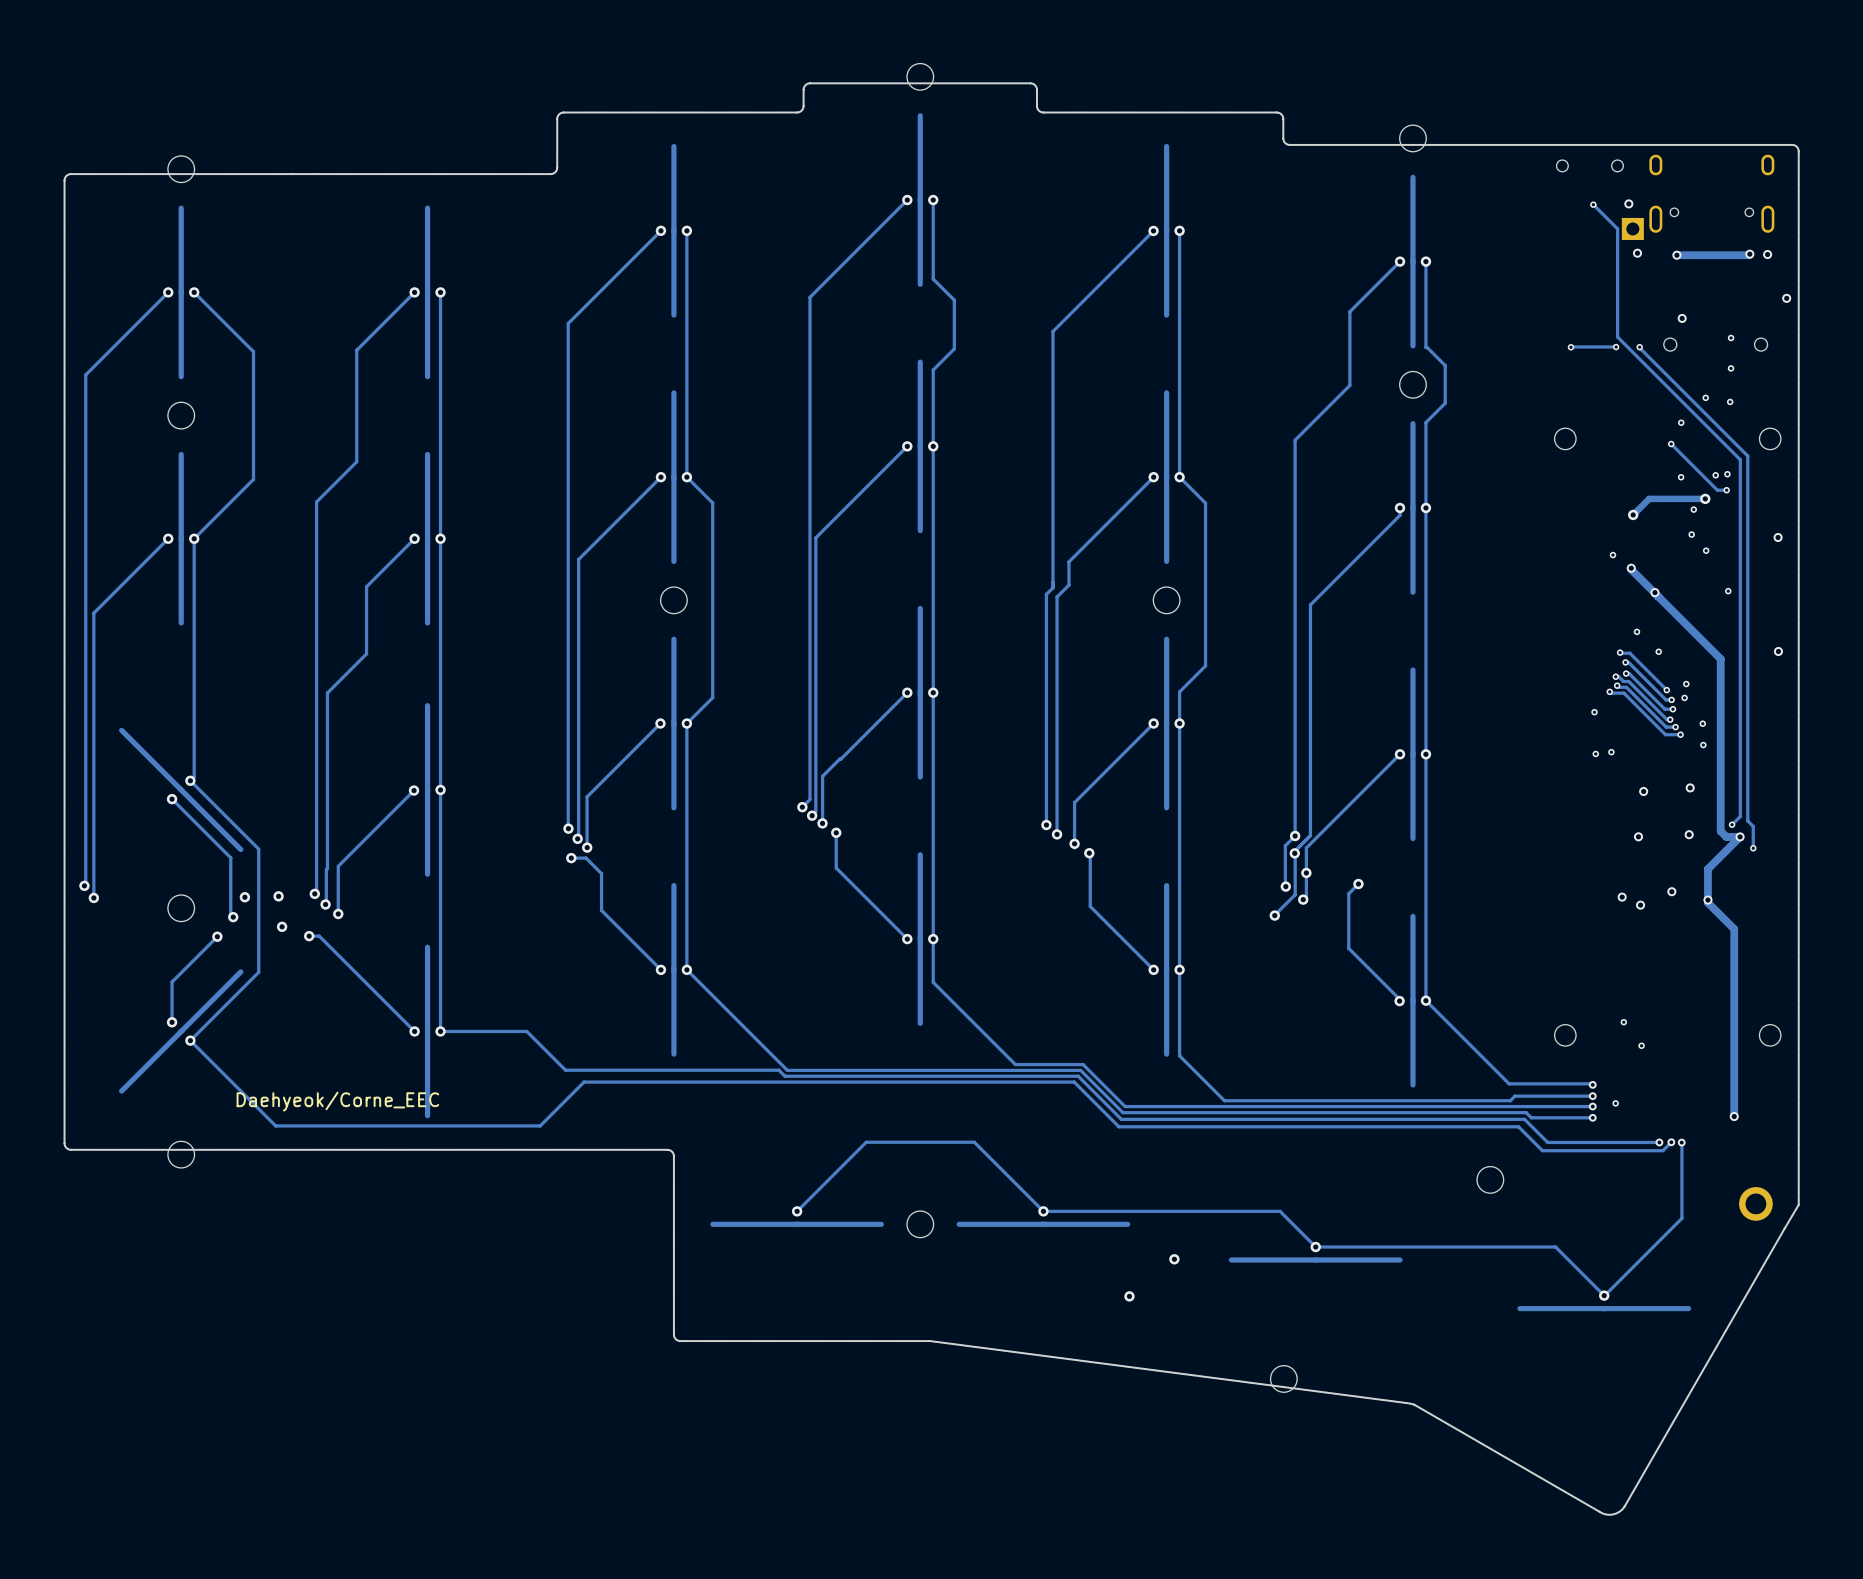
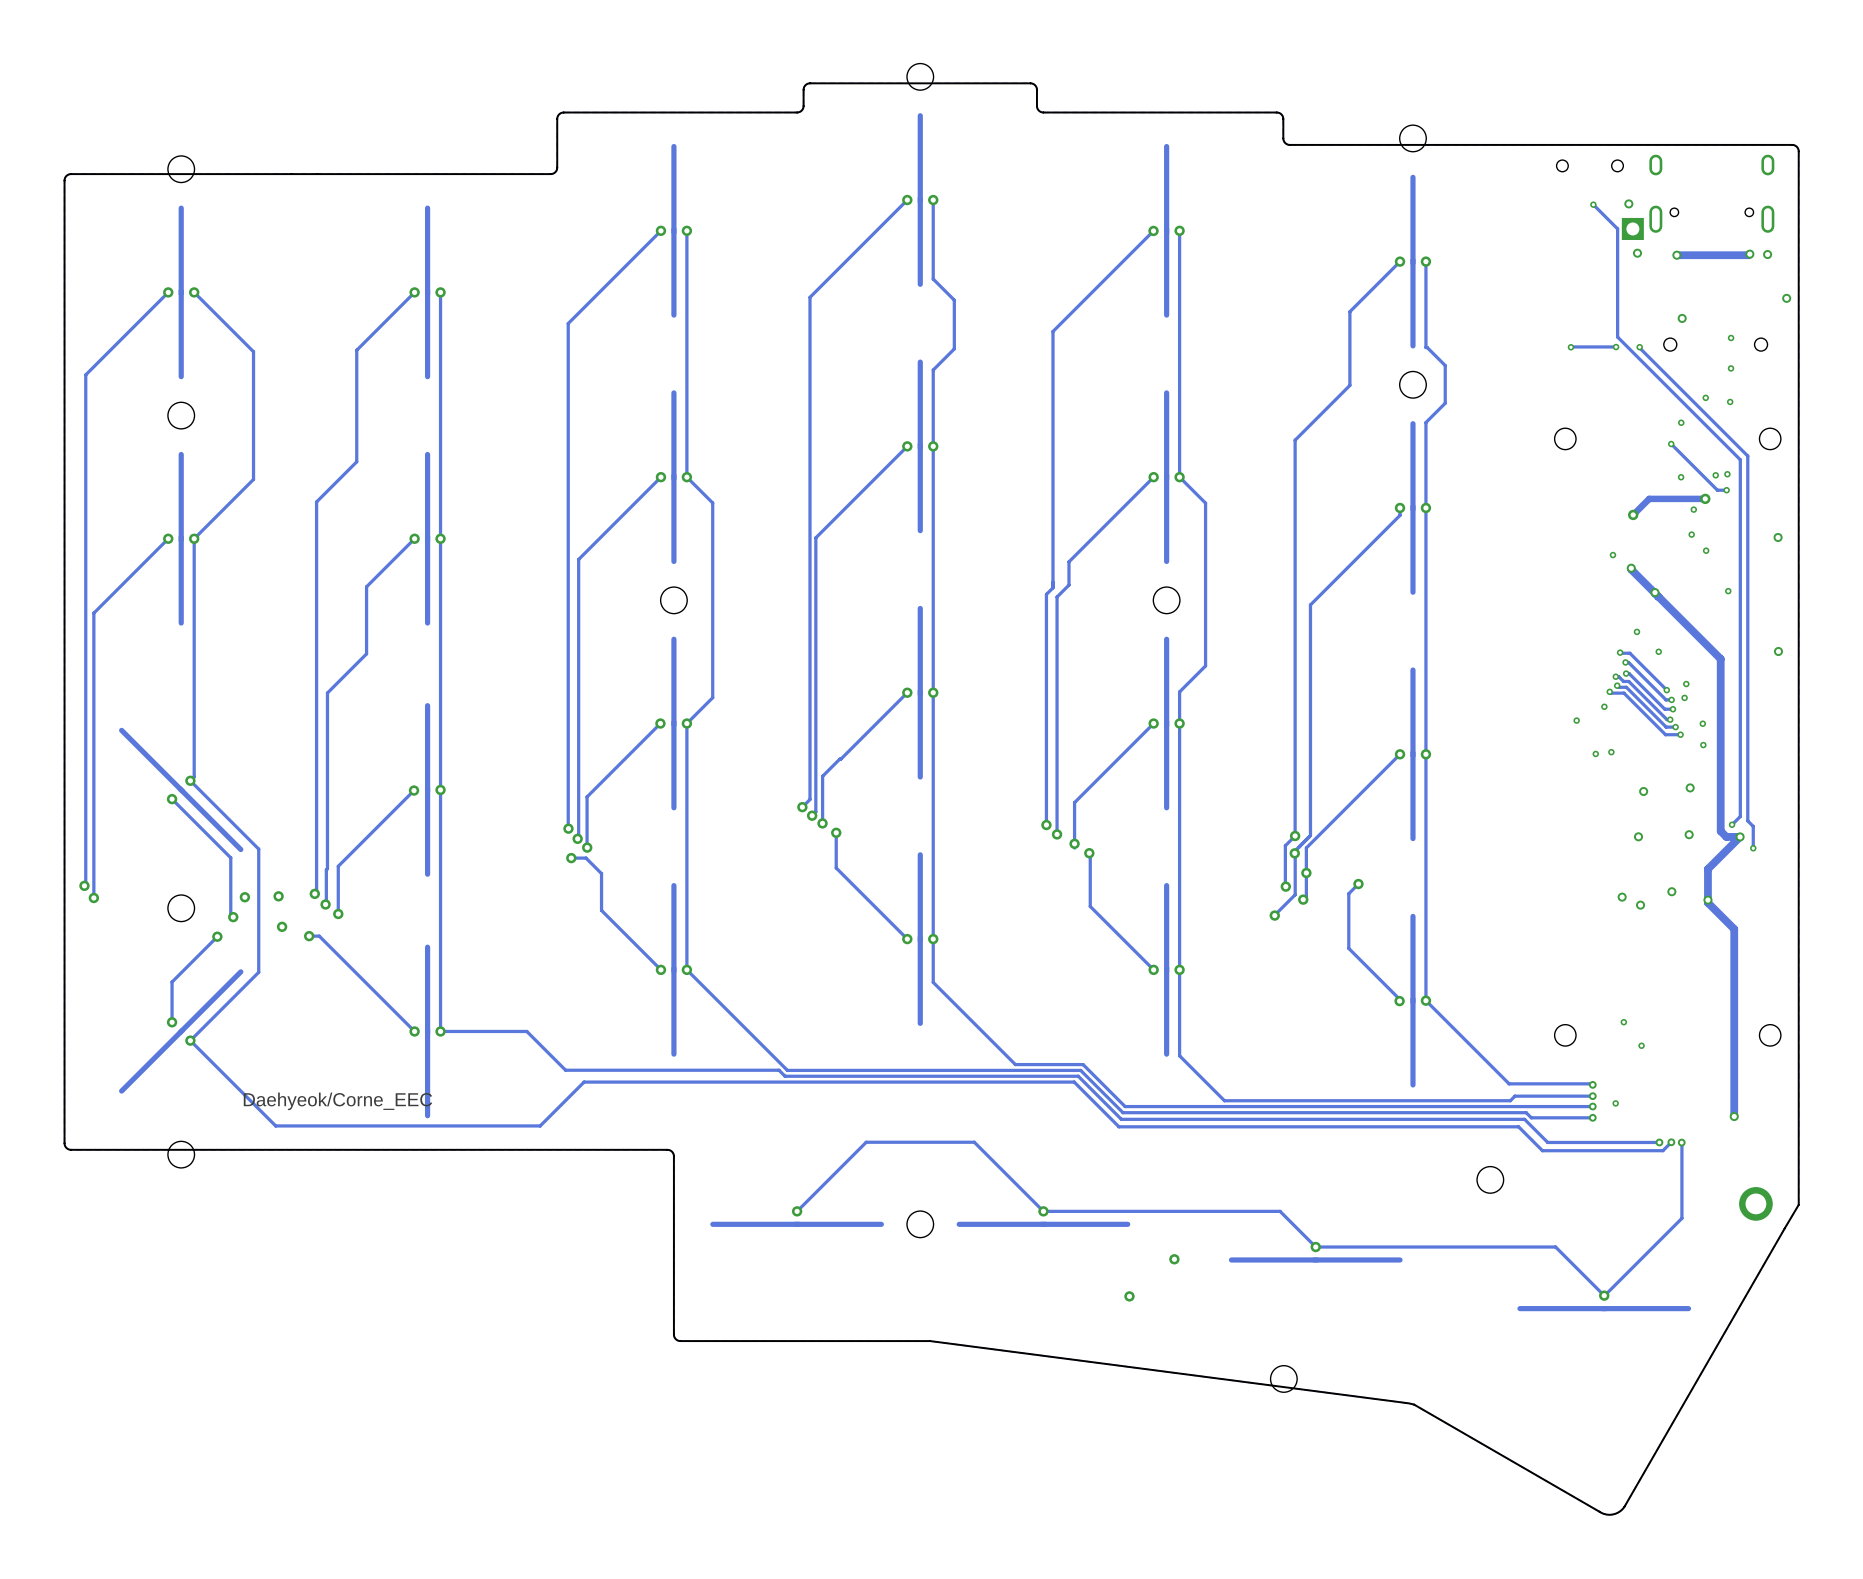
via: none -> (1604, 706)
via: (1594, 712) -> none
via: none -> (1576, 720)

